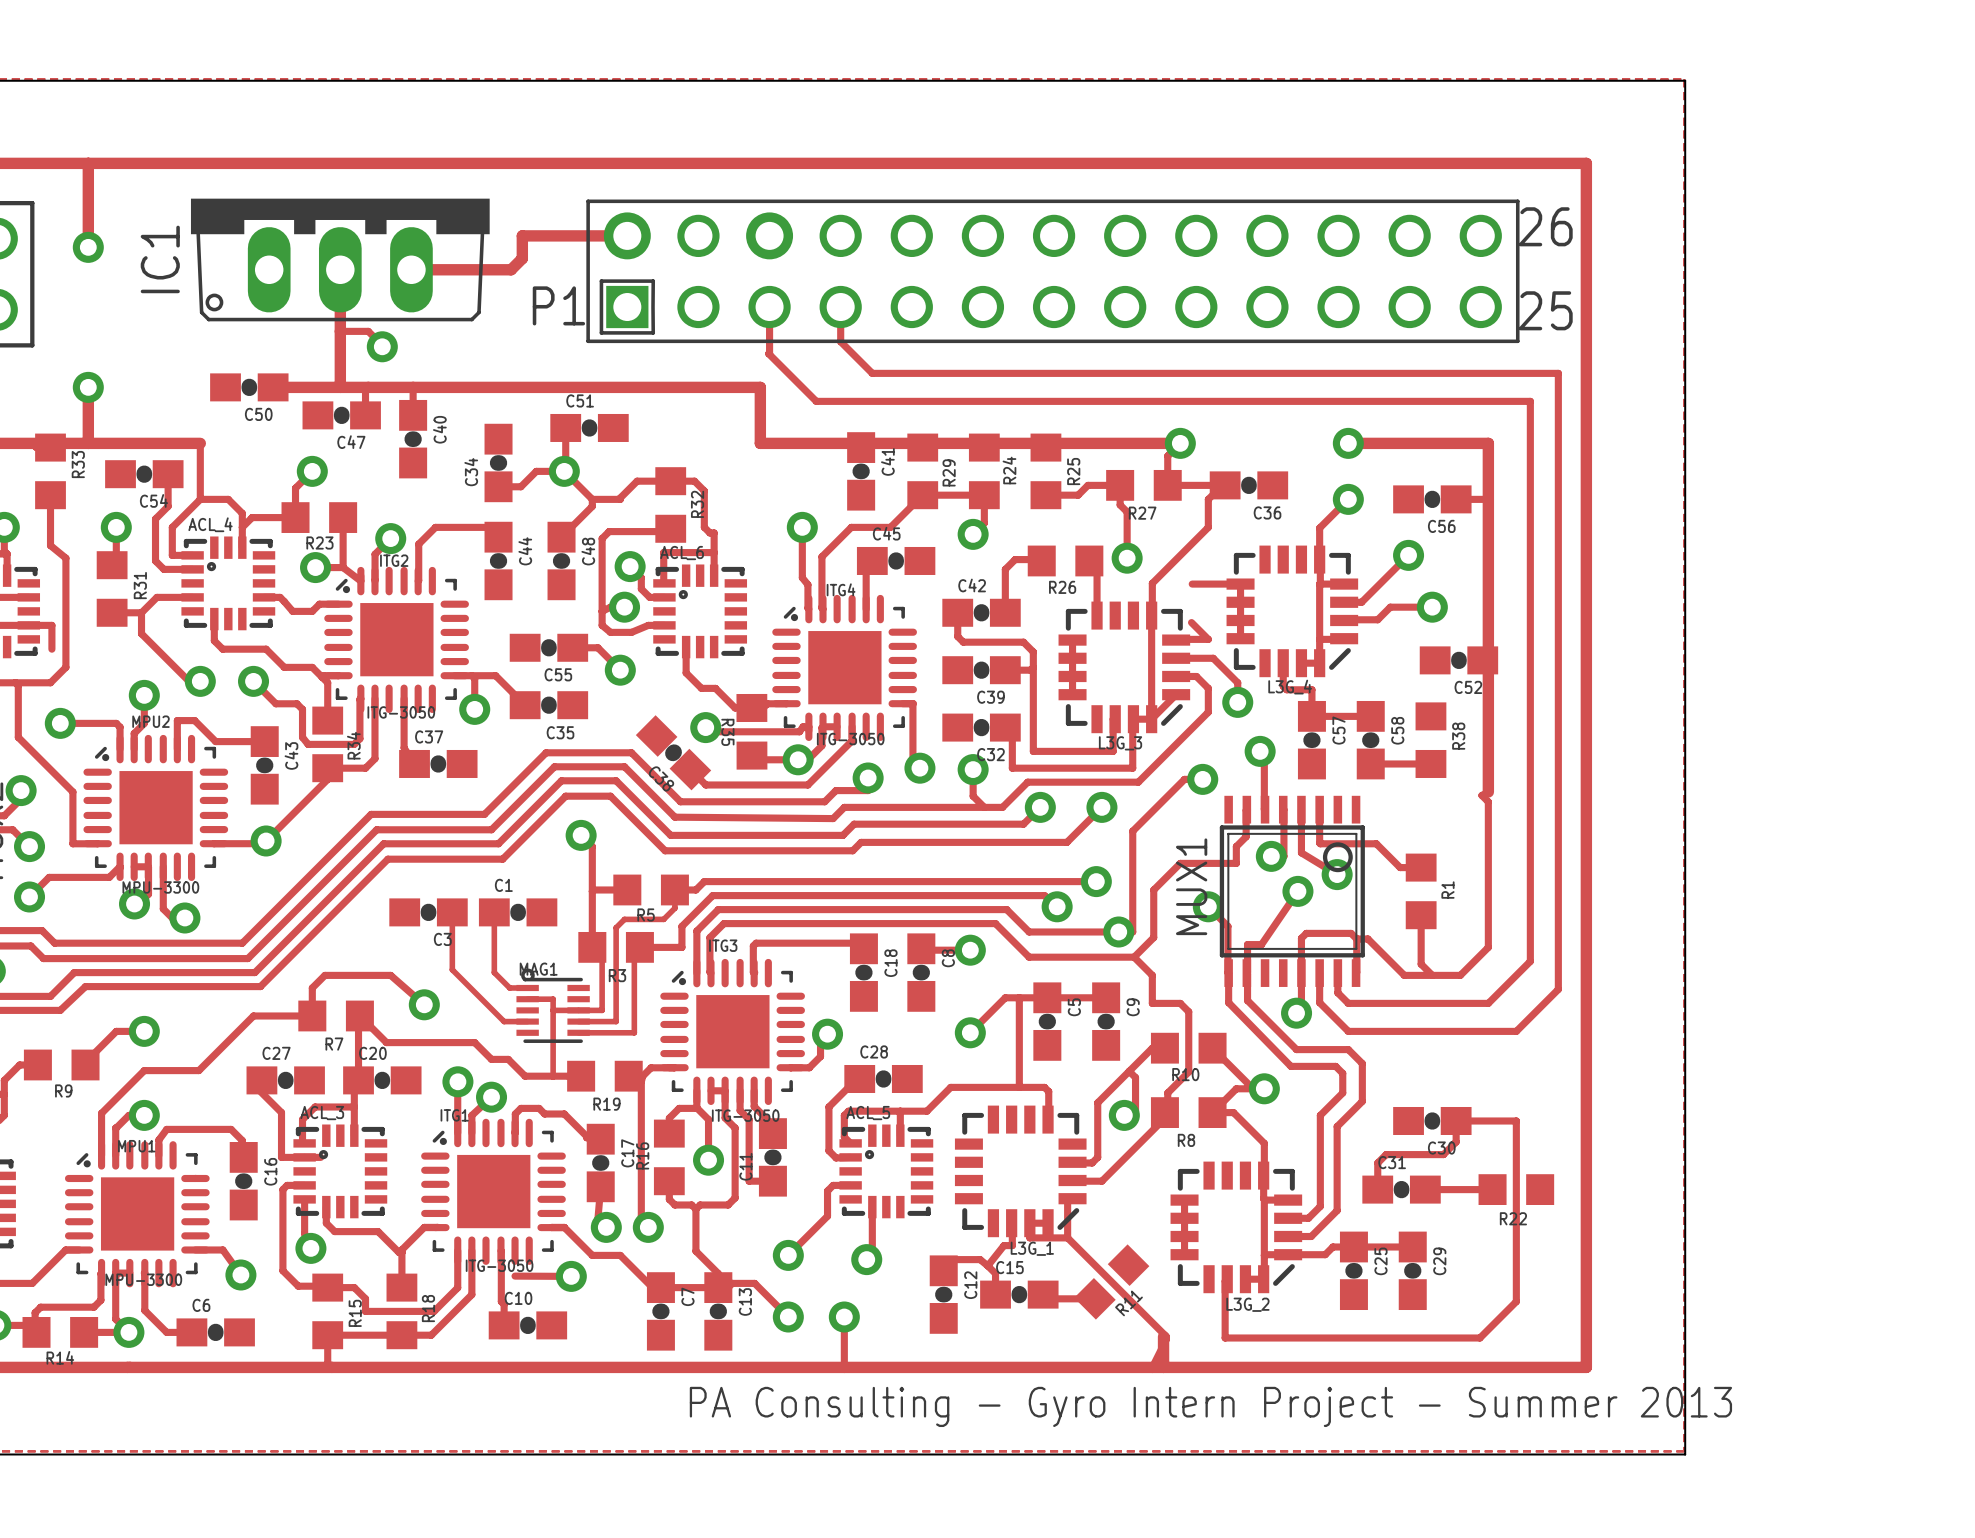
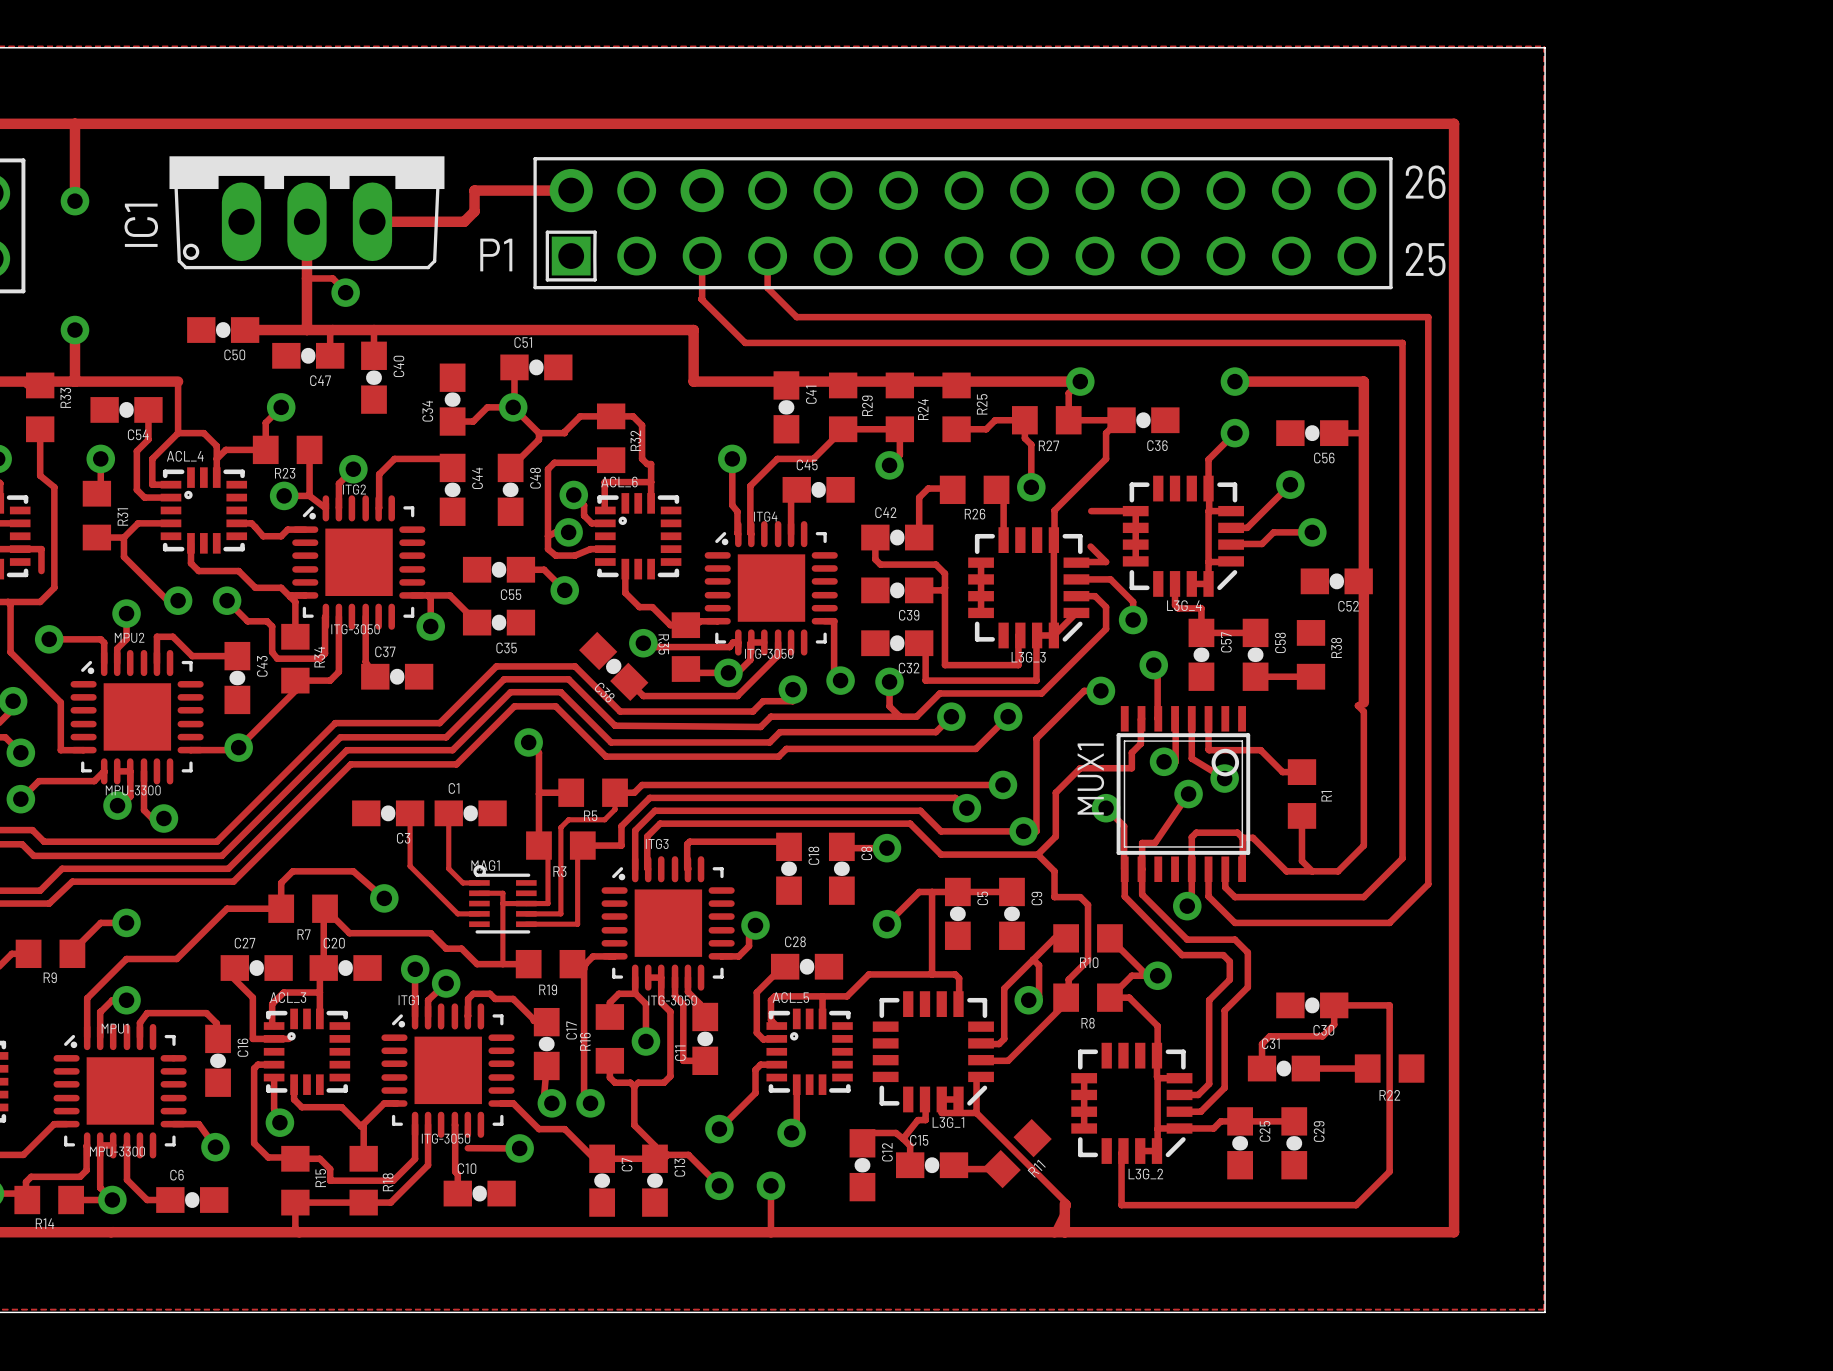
text: PA Consulting - Gyro Intern Project - Summer 2013 (1210, 1406) -> none

